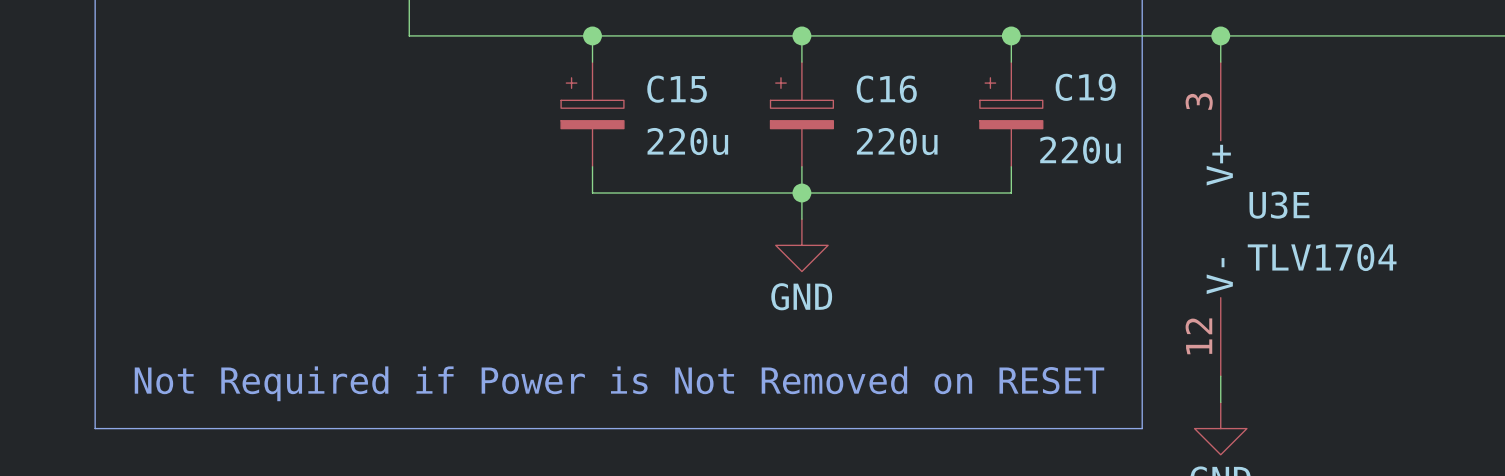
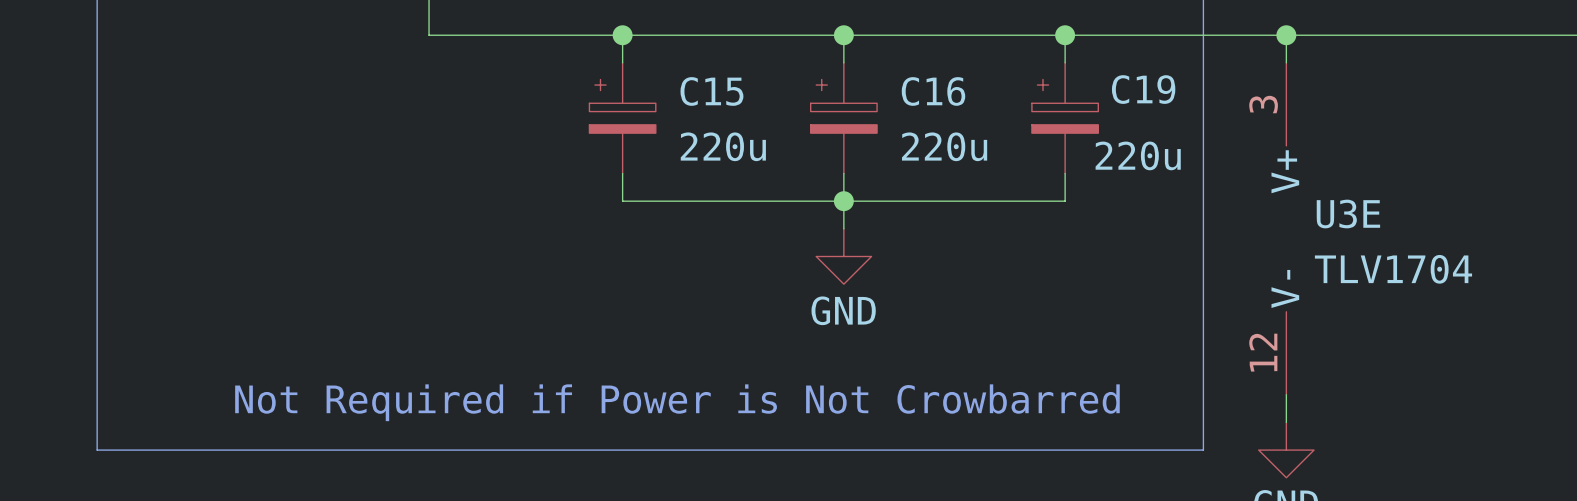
text: Not Required if Power is Not Removed on RESET (619, 383) -> Not Required if Power is Not Crowbarred (677, 402)

